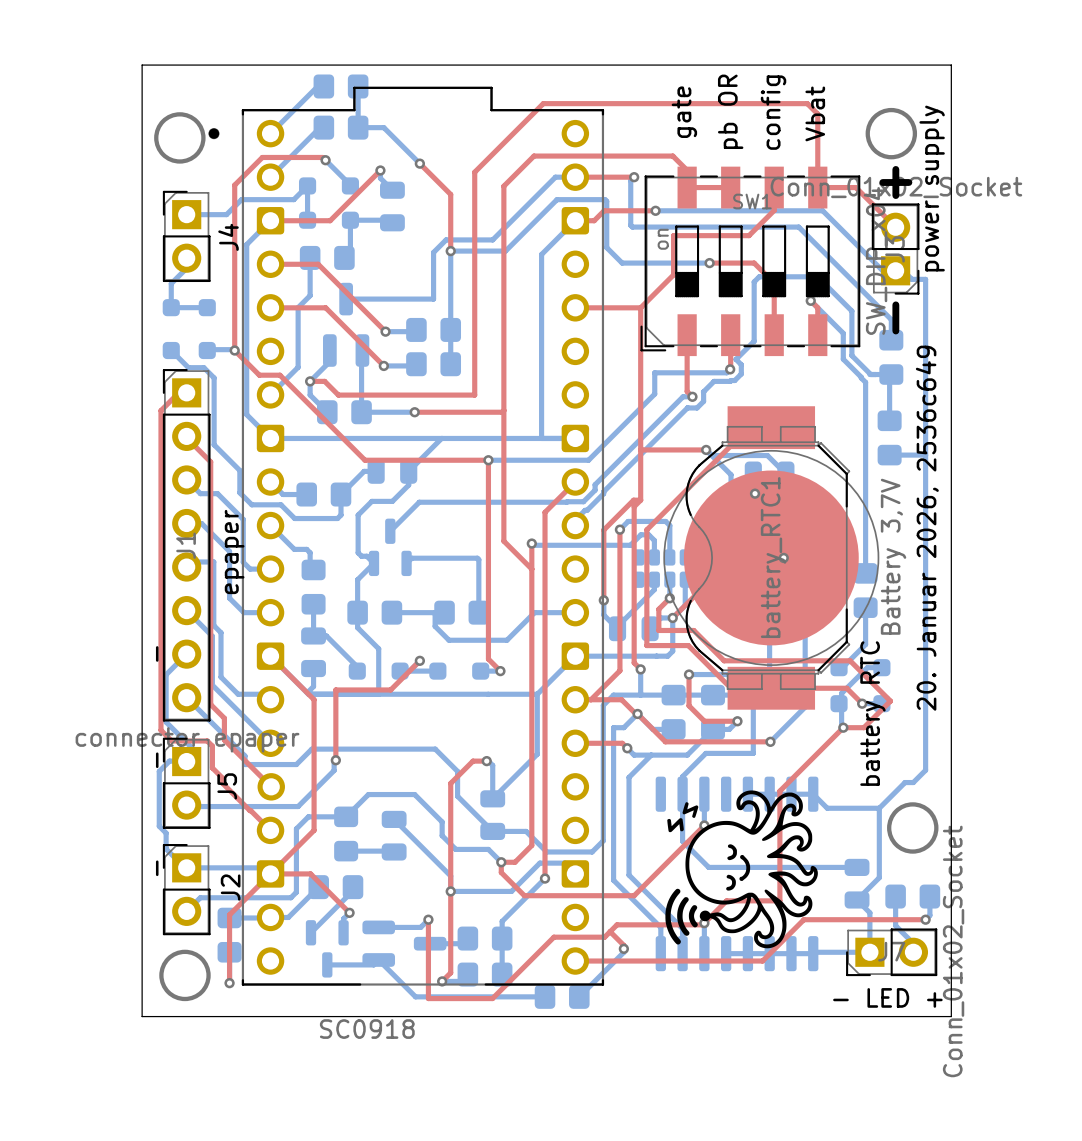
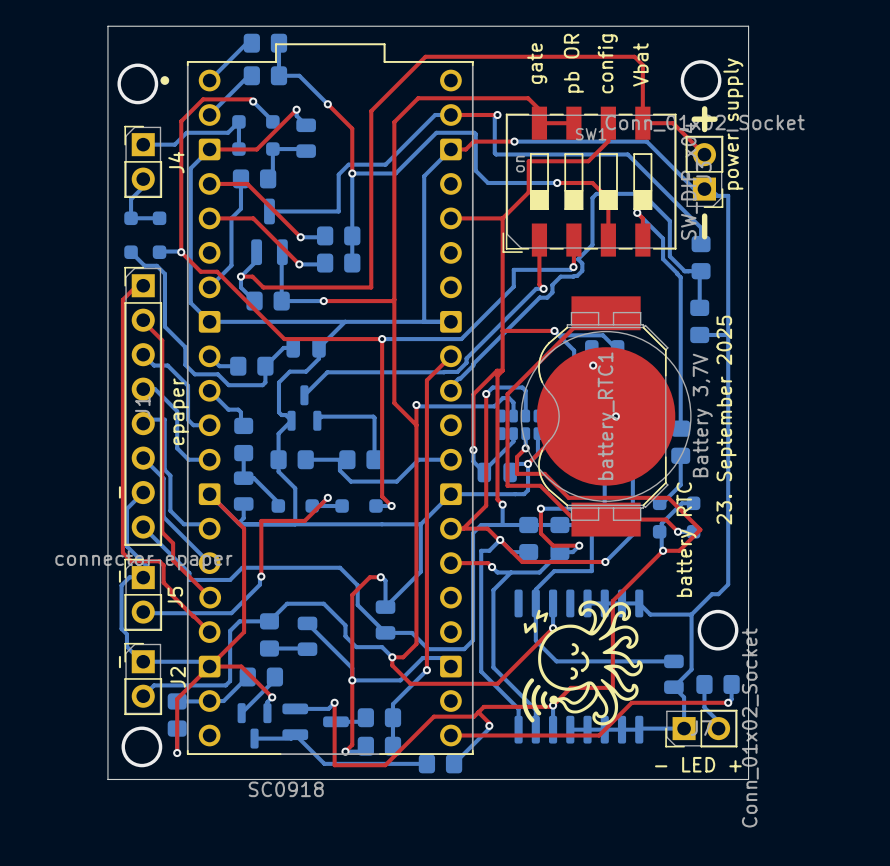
text: 20. Januar 2026, 2536c649 (927, 528) -> none
text: none -> 23. September 2025 (726, 420)

